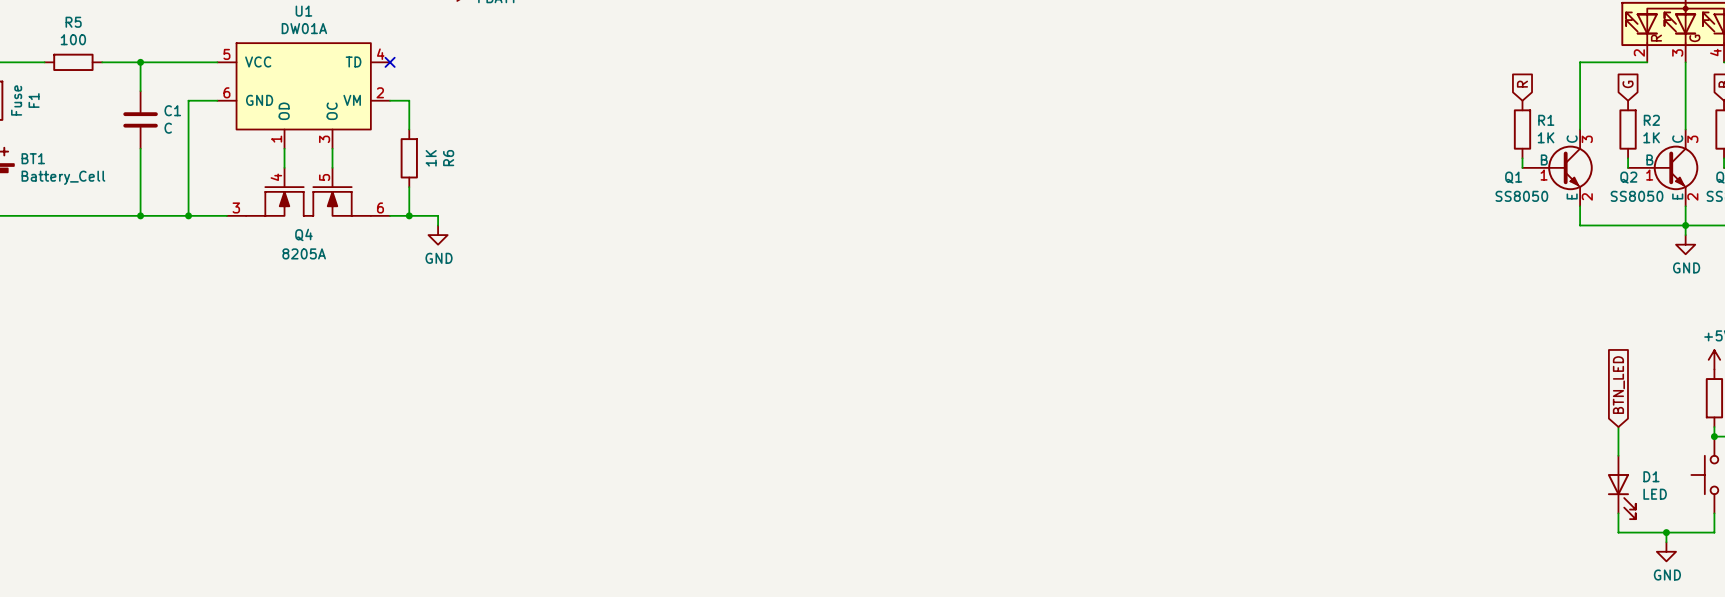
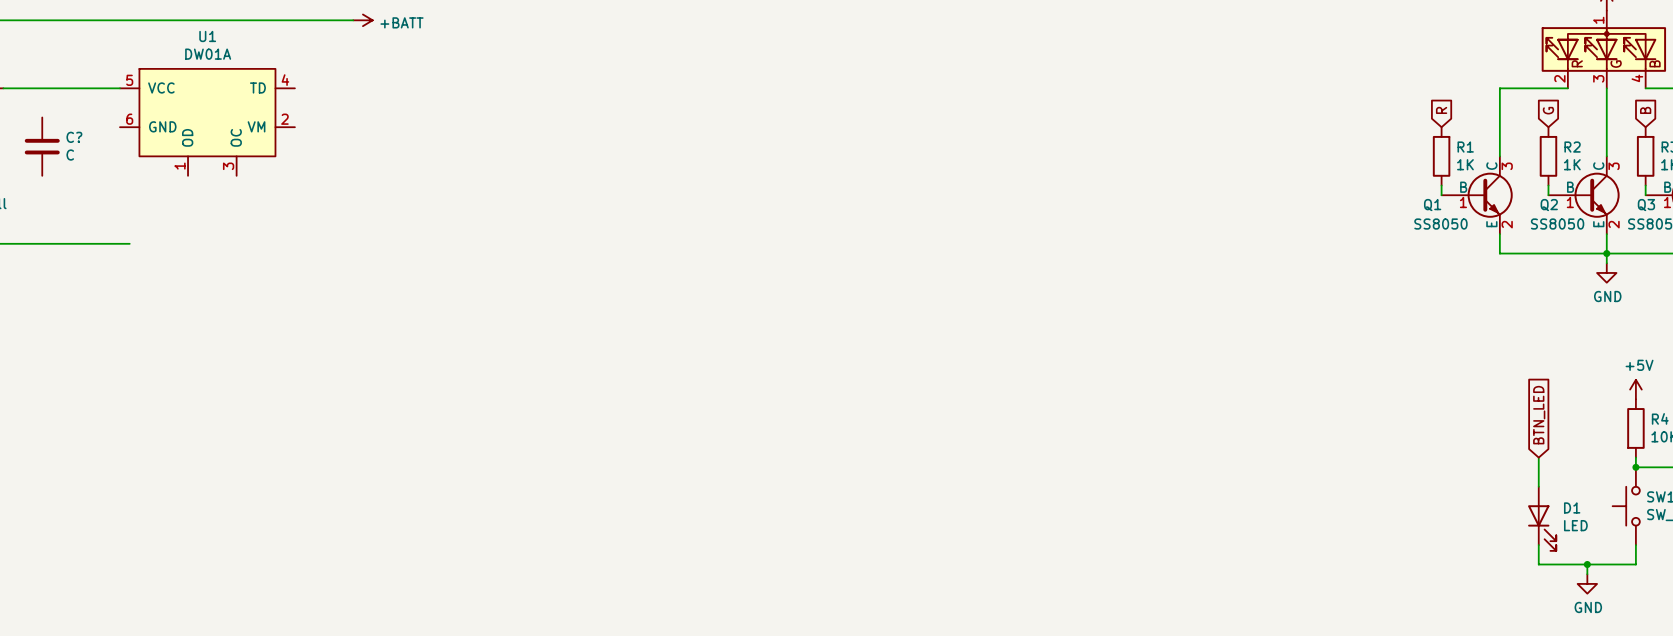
wire: (140, 62) (140, 91) -> none
junction: (140, 62) -> none
no-connect mark: (390, 62) -> none
wire: (217, 100) (188, 100) (188, 215) -> none
wire: (390, 100) (409, 100) (409, 129) -> none
C1 name: C1 (172, 110) -> C? (74, 137)
wire: (140, 148) (140, 215) -> none
wire: (284, 148) (284, 167) -> none
wire: (332, 148) (332, 167) -> none
R6: 1K (409, 158) -> none
wire: (409, 187) (409, 215) -> none
Q4: 8205A (308, 191) -> none
junction: (140, 215) -> none
junction: (188, 215) -> none
wire: (390, 215) (438, 215) (438, 225) -> none
junction: (409, 215) -> none
power symbol: GND (438, 235) -> none

